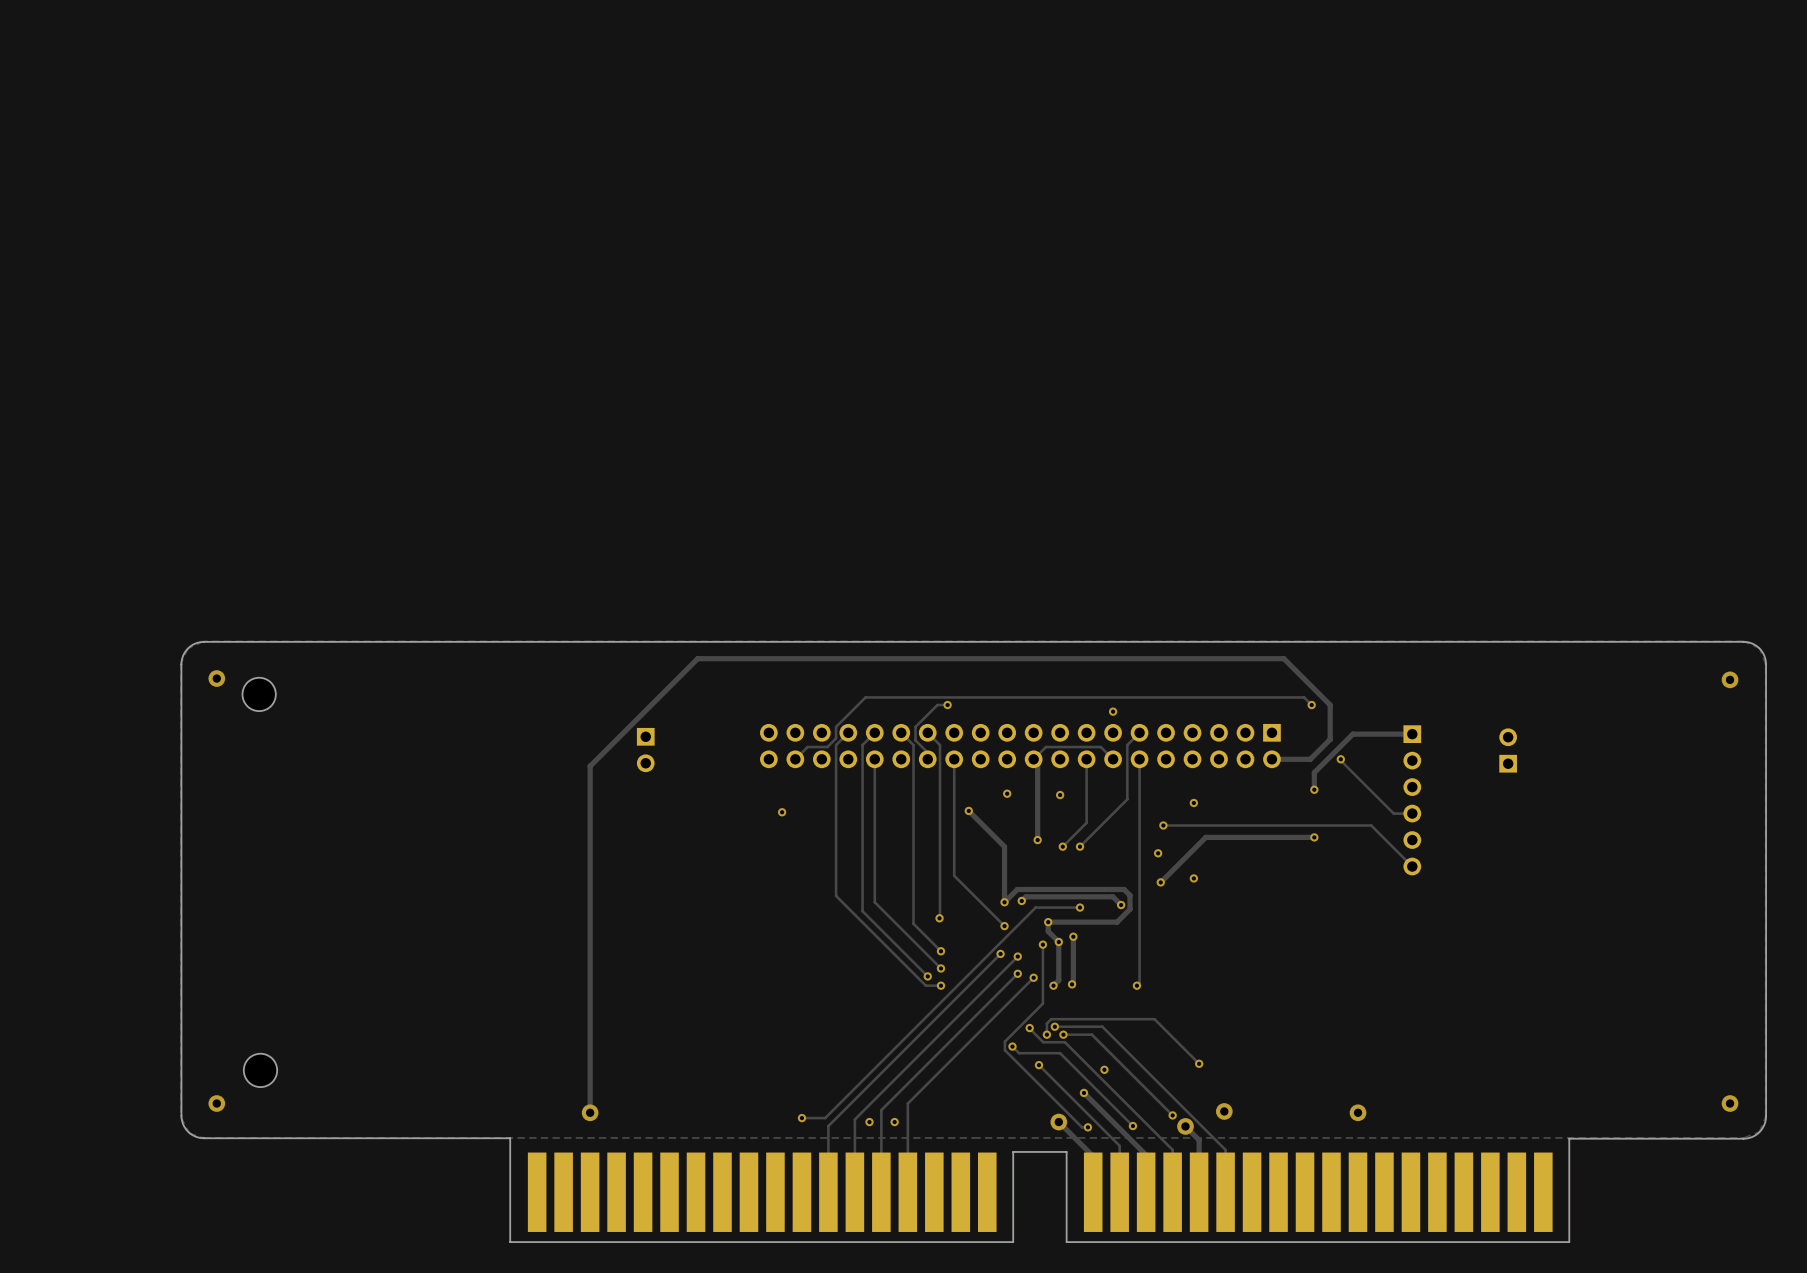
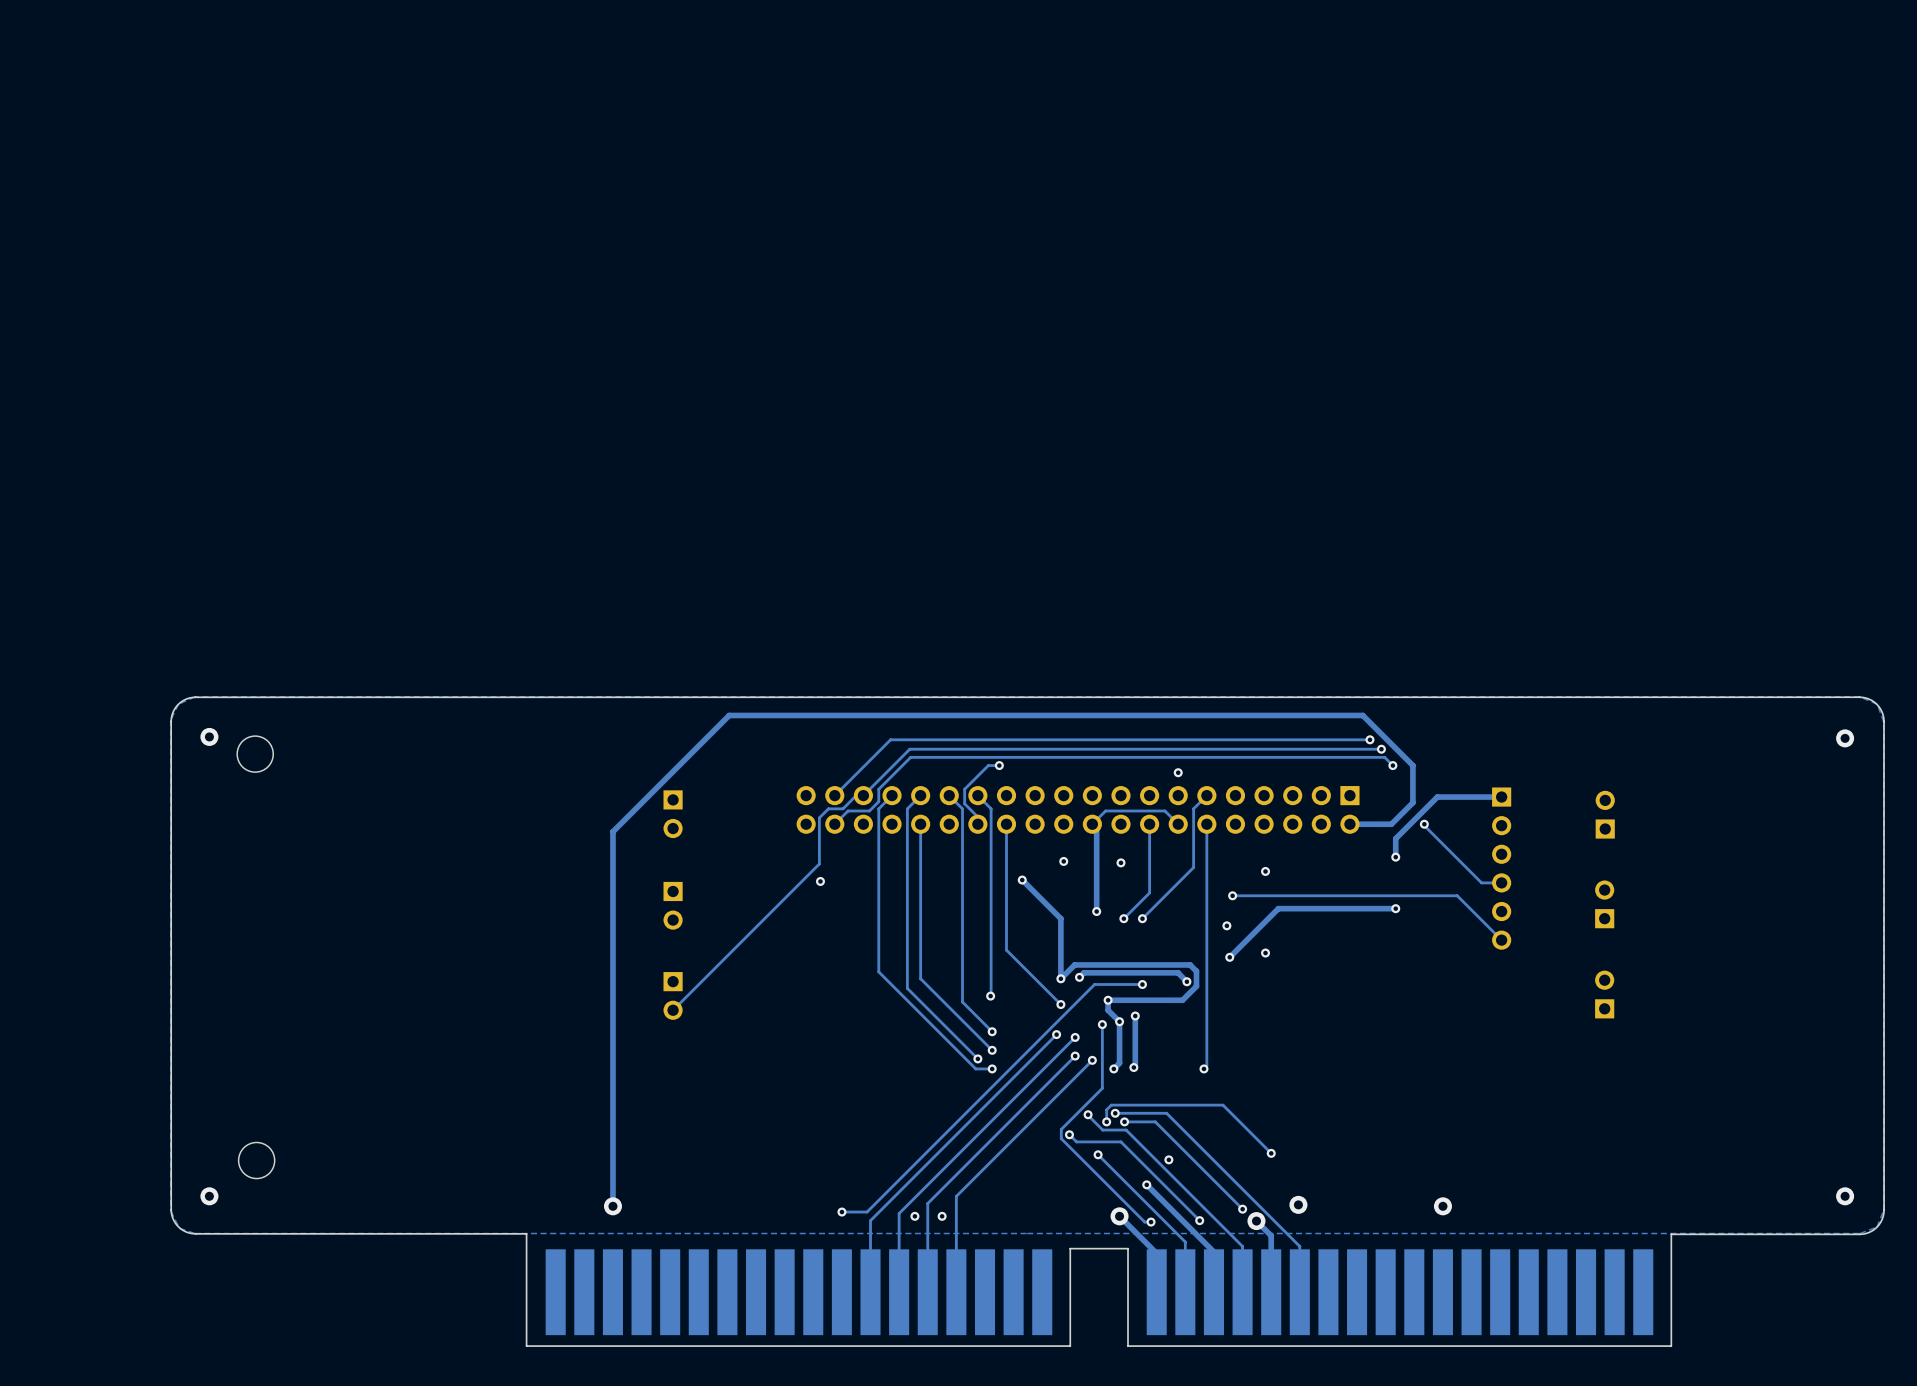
track: none -> (1369, 739) (890, 739) (834, 795)
via: none -> (1369, 739)
track: none -> (1381, 749) (909, 749) (863, 795) (856, 795) (842, 808) (828, 808) (819, 817) (819, 863) (673, 1010)
via: none -> (1381, 749)
part: none -> (1604, 904)
part: none -> (673, 905)
part: none -> (1604, 994)
part: none -> (673, 995)

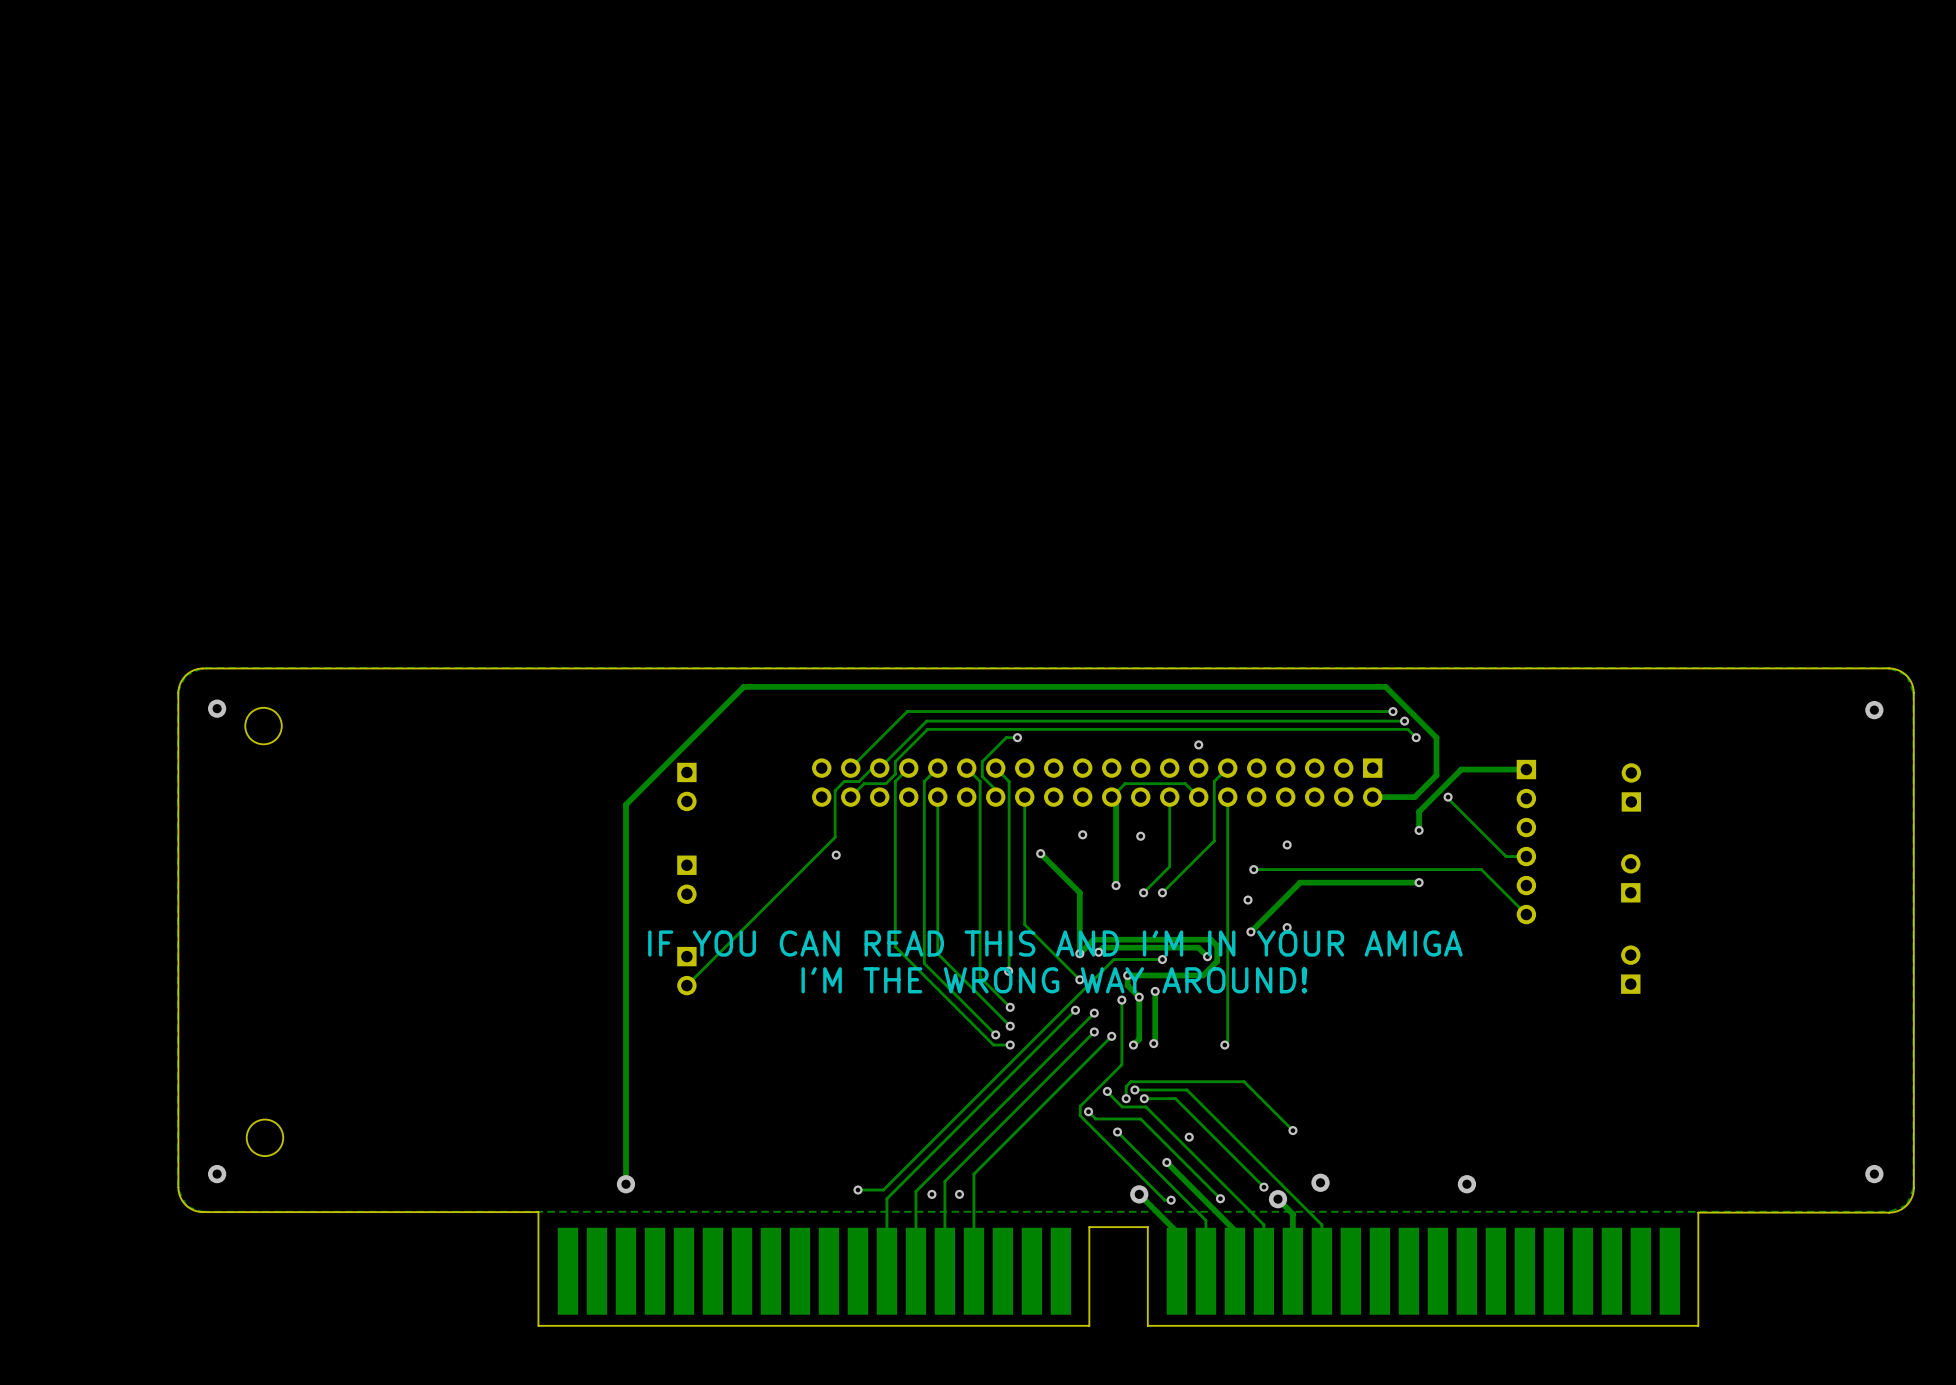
text: none -> IF YOU CAN READ THIS AND I'M IN YOUR AMIGA (1055, 943)
text: none -> I'M THE WRONG WAY AROUND! (1054, 980)

